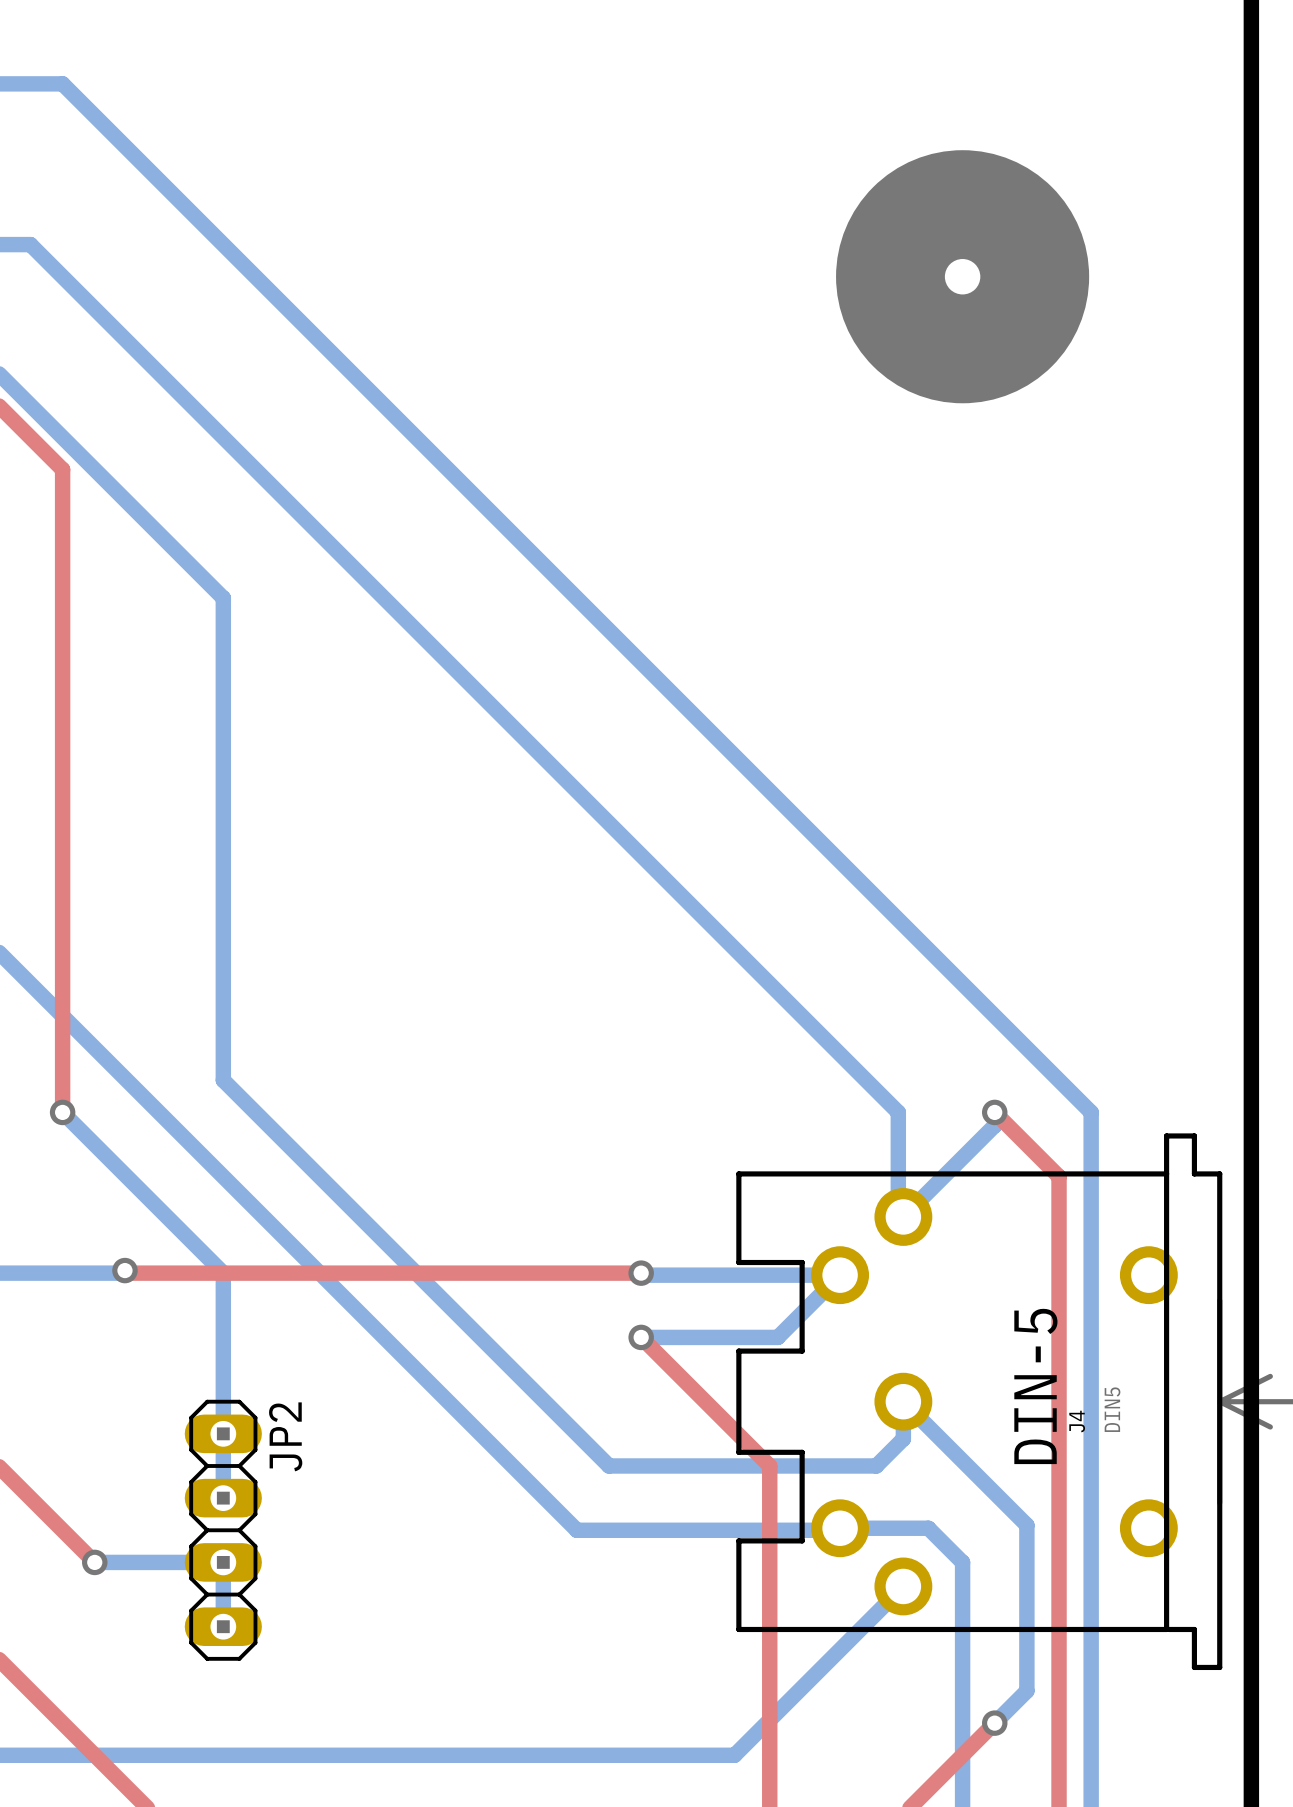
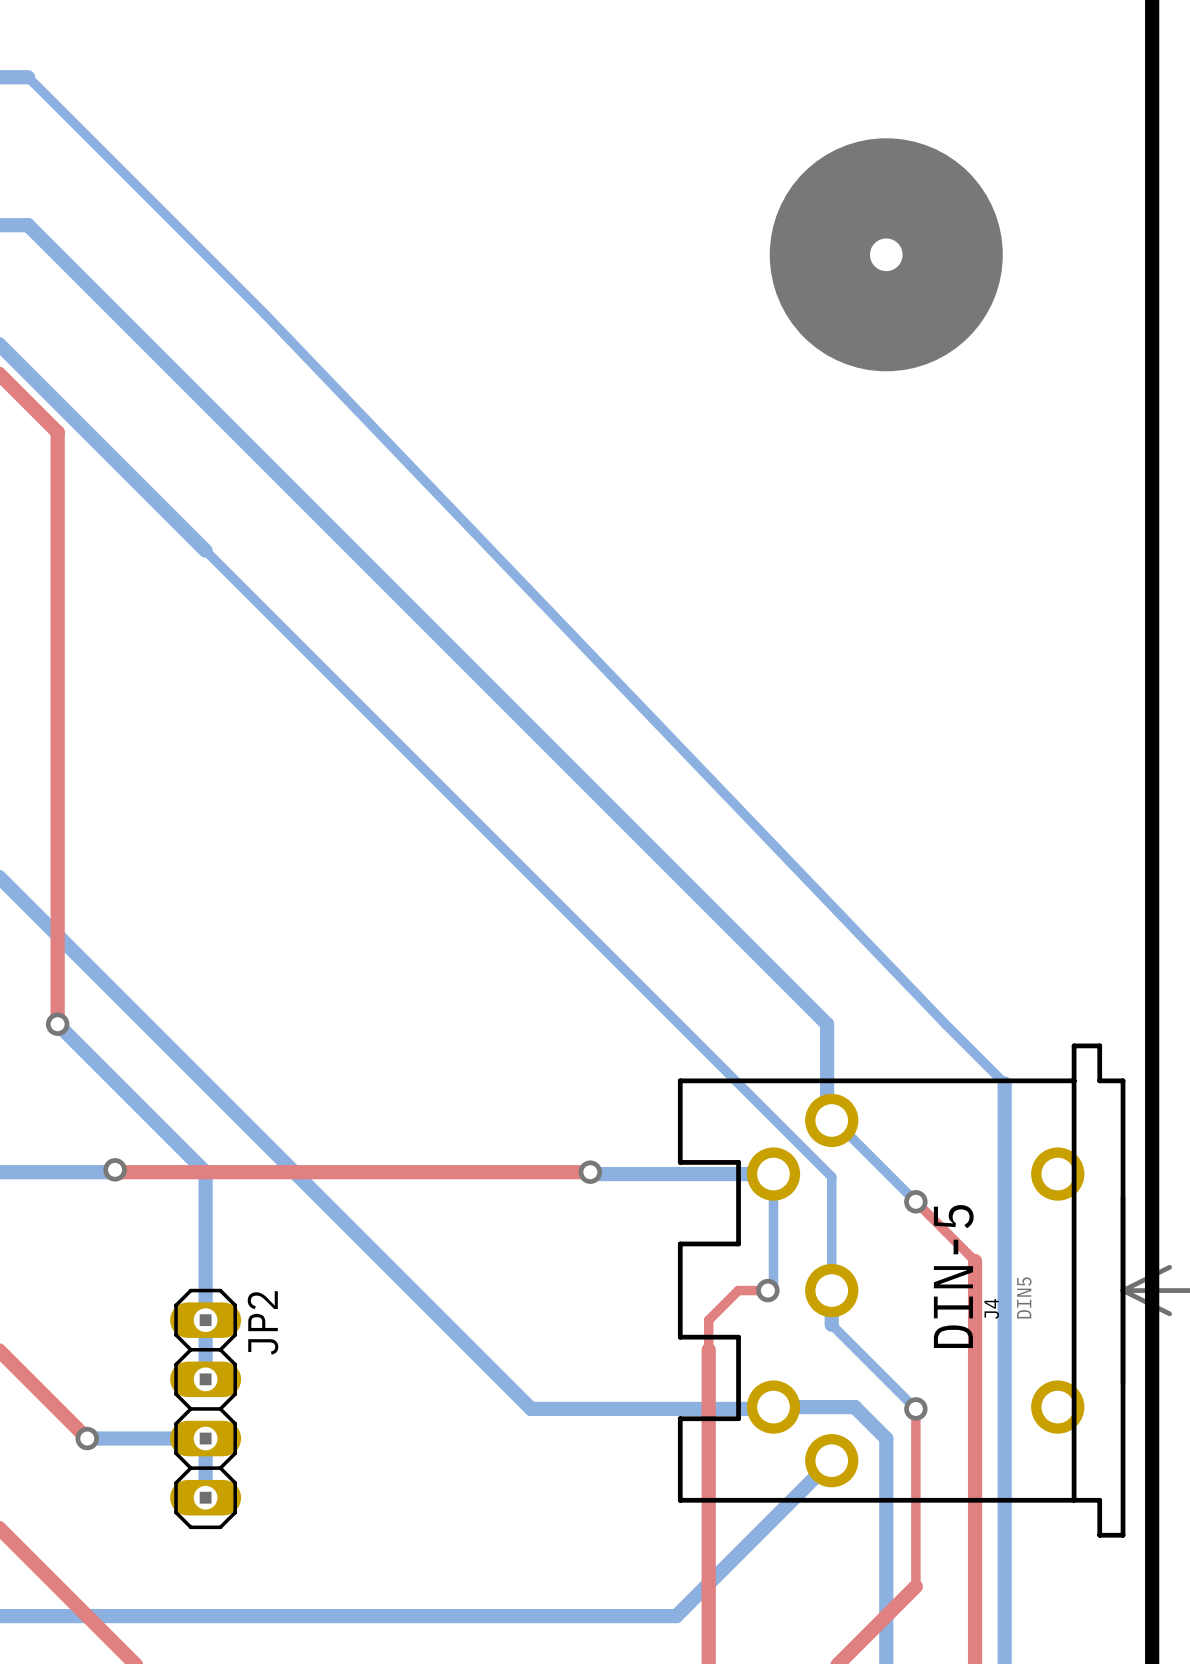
bottom track: (30, 83) (62, 83) (1091, 1112) (1091, 1176) -> (28, 77) (265, 314) (945, 1024) (1004, 1083)
bottom track: (223, 598) (223, 1080) (609, 1465) (876, 1465) (903, 1438) -> (205, 550) (831, 1176) (831, 1290)
bottom track: (994, 1112) (994, 1125) (903, 1216) -> none
top track: (994, 1112) (1059, 1176) (1059, 1369) -> (915, 1201) (975, 1260)
via: (994, 1112) -> none
bottom track: none -> (831, 1119) (915, 1201)
bottom track: (840, 1275) (777, 1337) (641, 1337) -> (773, 1174) (773, 1284) (767, 1290)
via: none -> (915, 1201)
top track: (641, 1337) (769, 1465) -> (767, 1290) (738, 1290) (708, 1320) (708, 1349)
via: (641, 1337) -> none
via: none -> (767, 1290)
bottom track: (903, 1401) (1026, 1525) (1026, 1690) (994, 1723) -> none
bottom track: none -> (831, 1324) (915, 1408)
top track: none -> (915, 1408) (915, 1586)
via: none -> (915, 1408)
via: (994, 1723) -> none

